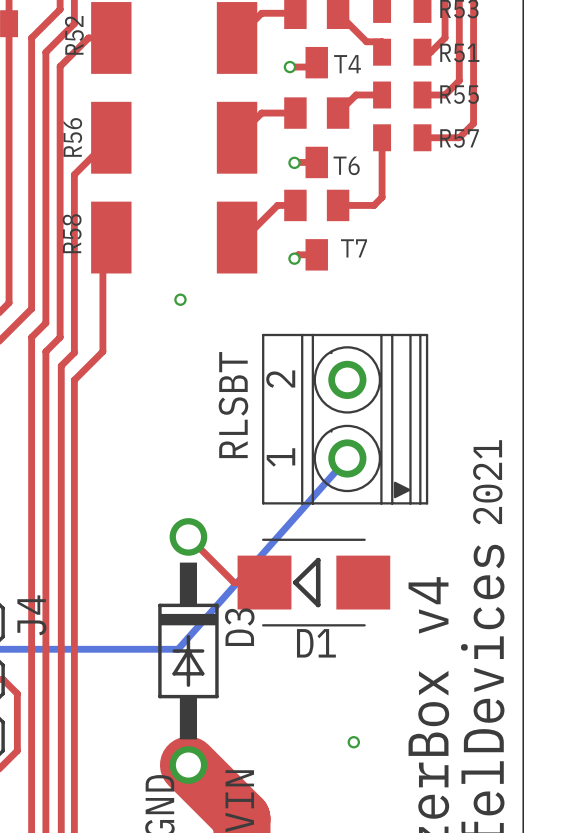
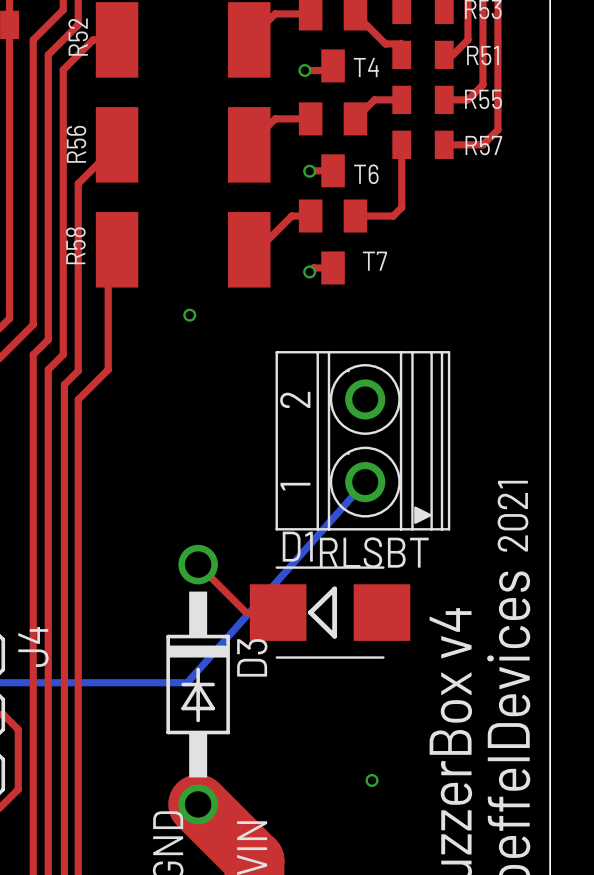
RLSBT name rotation: 0° (233, 405) -> 90° clockwise (374, 552)
RLSBT name position: RLSBT (233, 405) -> RLSBT (374, 552)
D1 name position: D1 (316, 643) -> D1 (297, 546)

